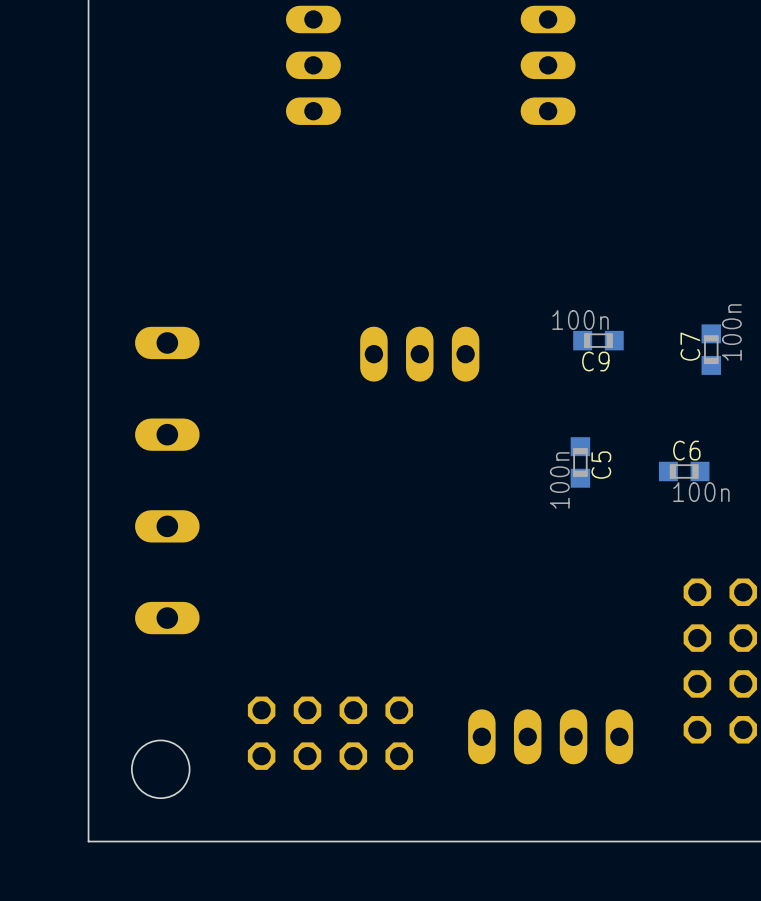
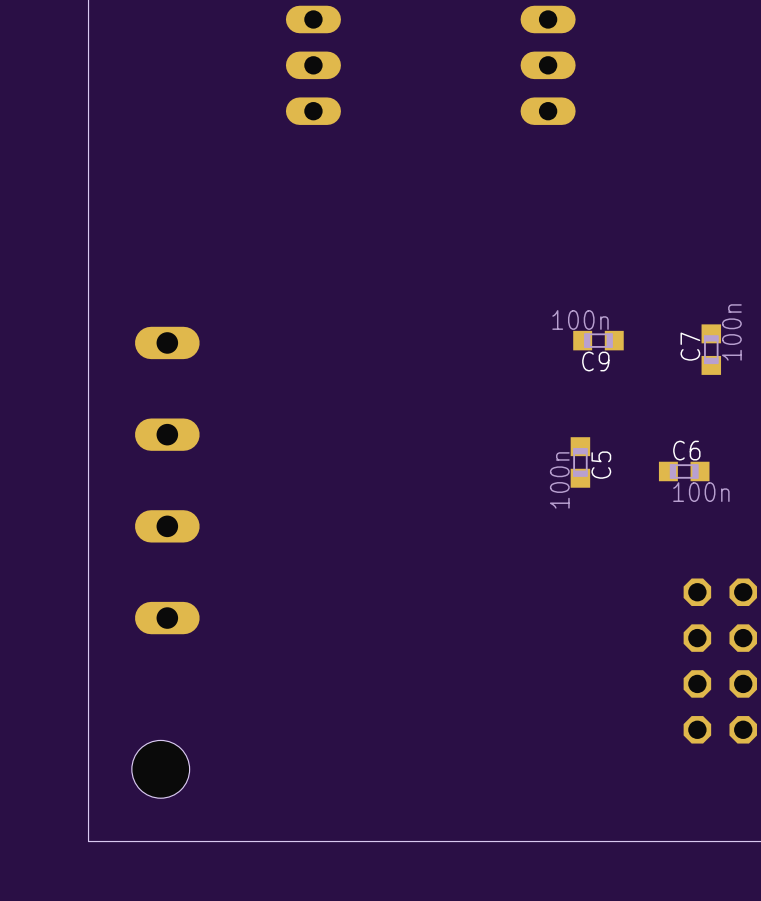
part: (419, 354) -> none
part: (330, 733) -> none
part: (550, 736) -> none

